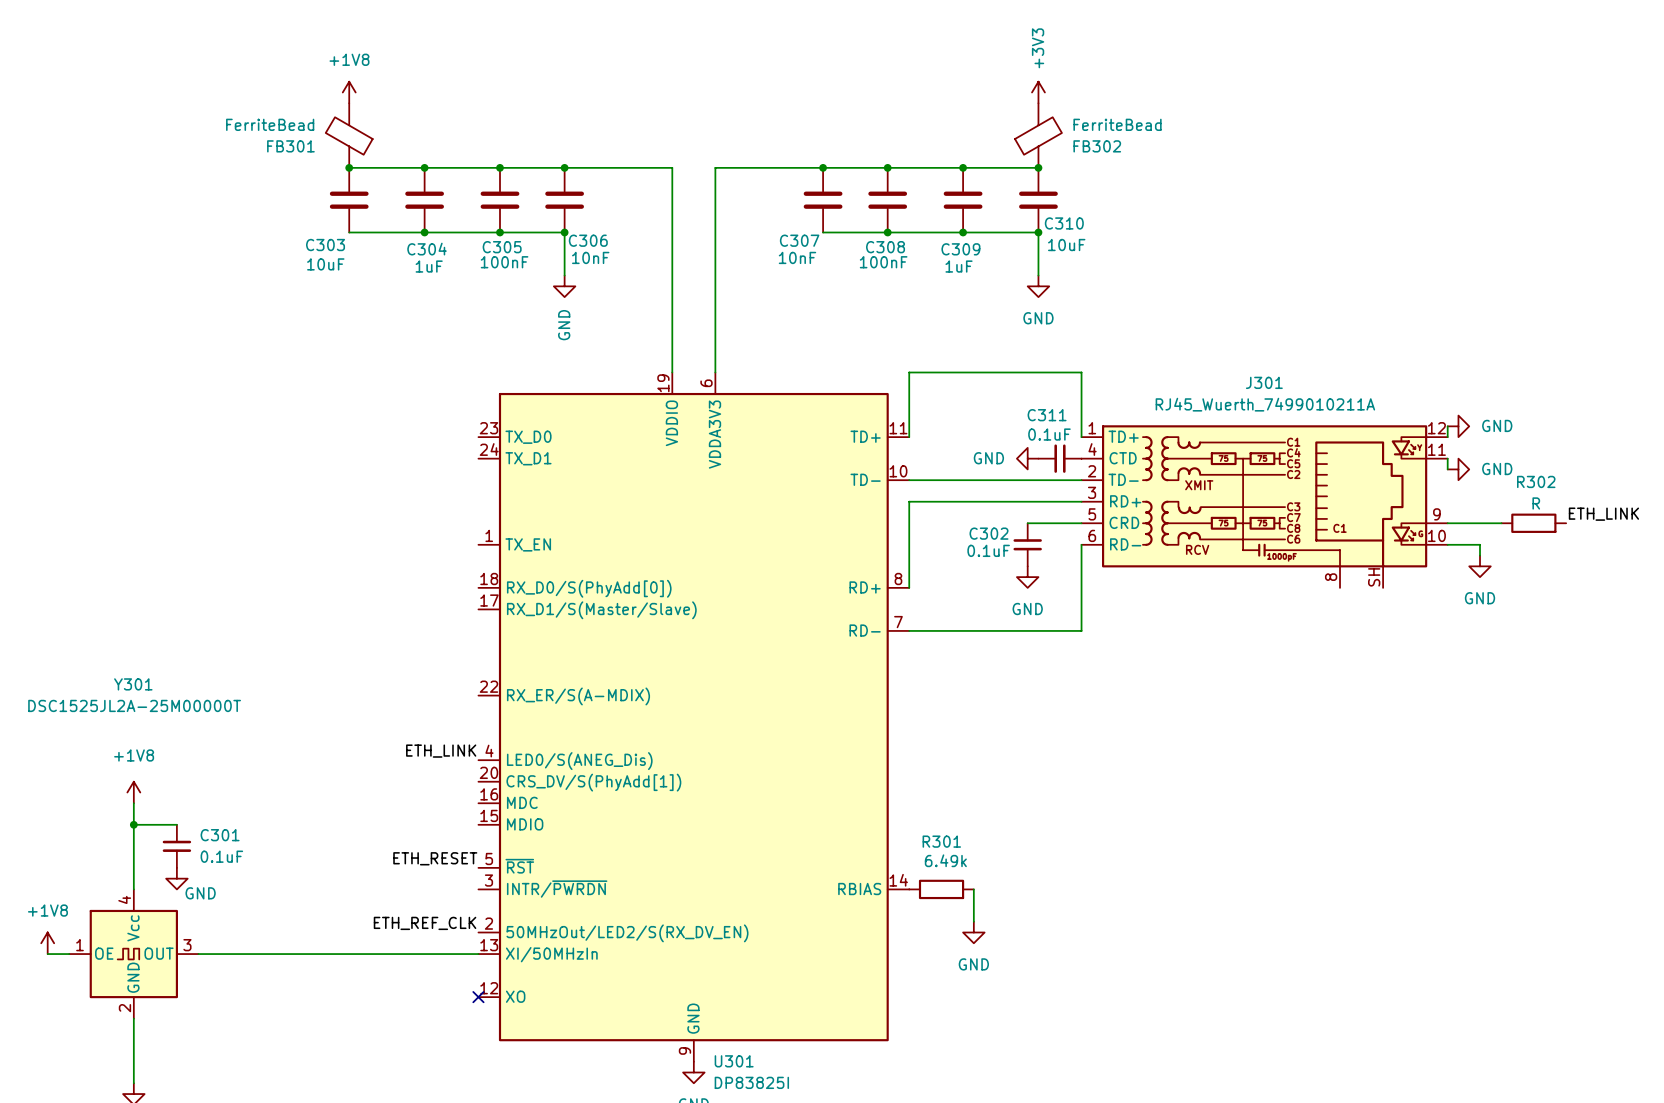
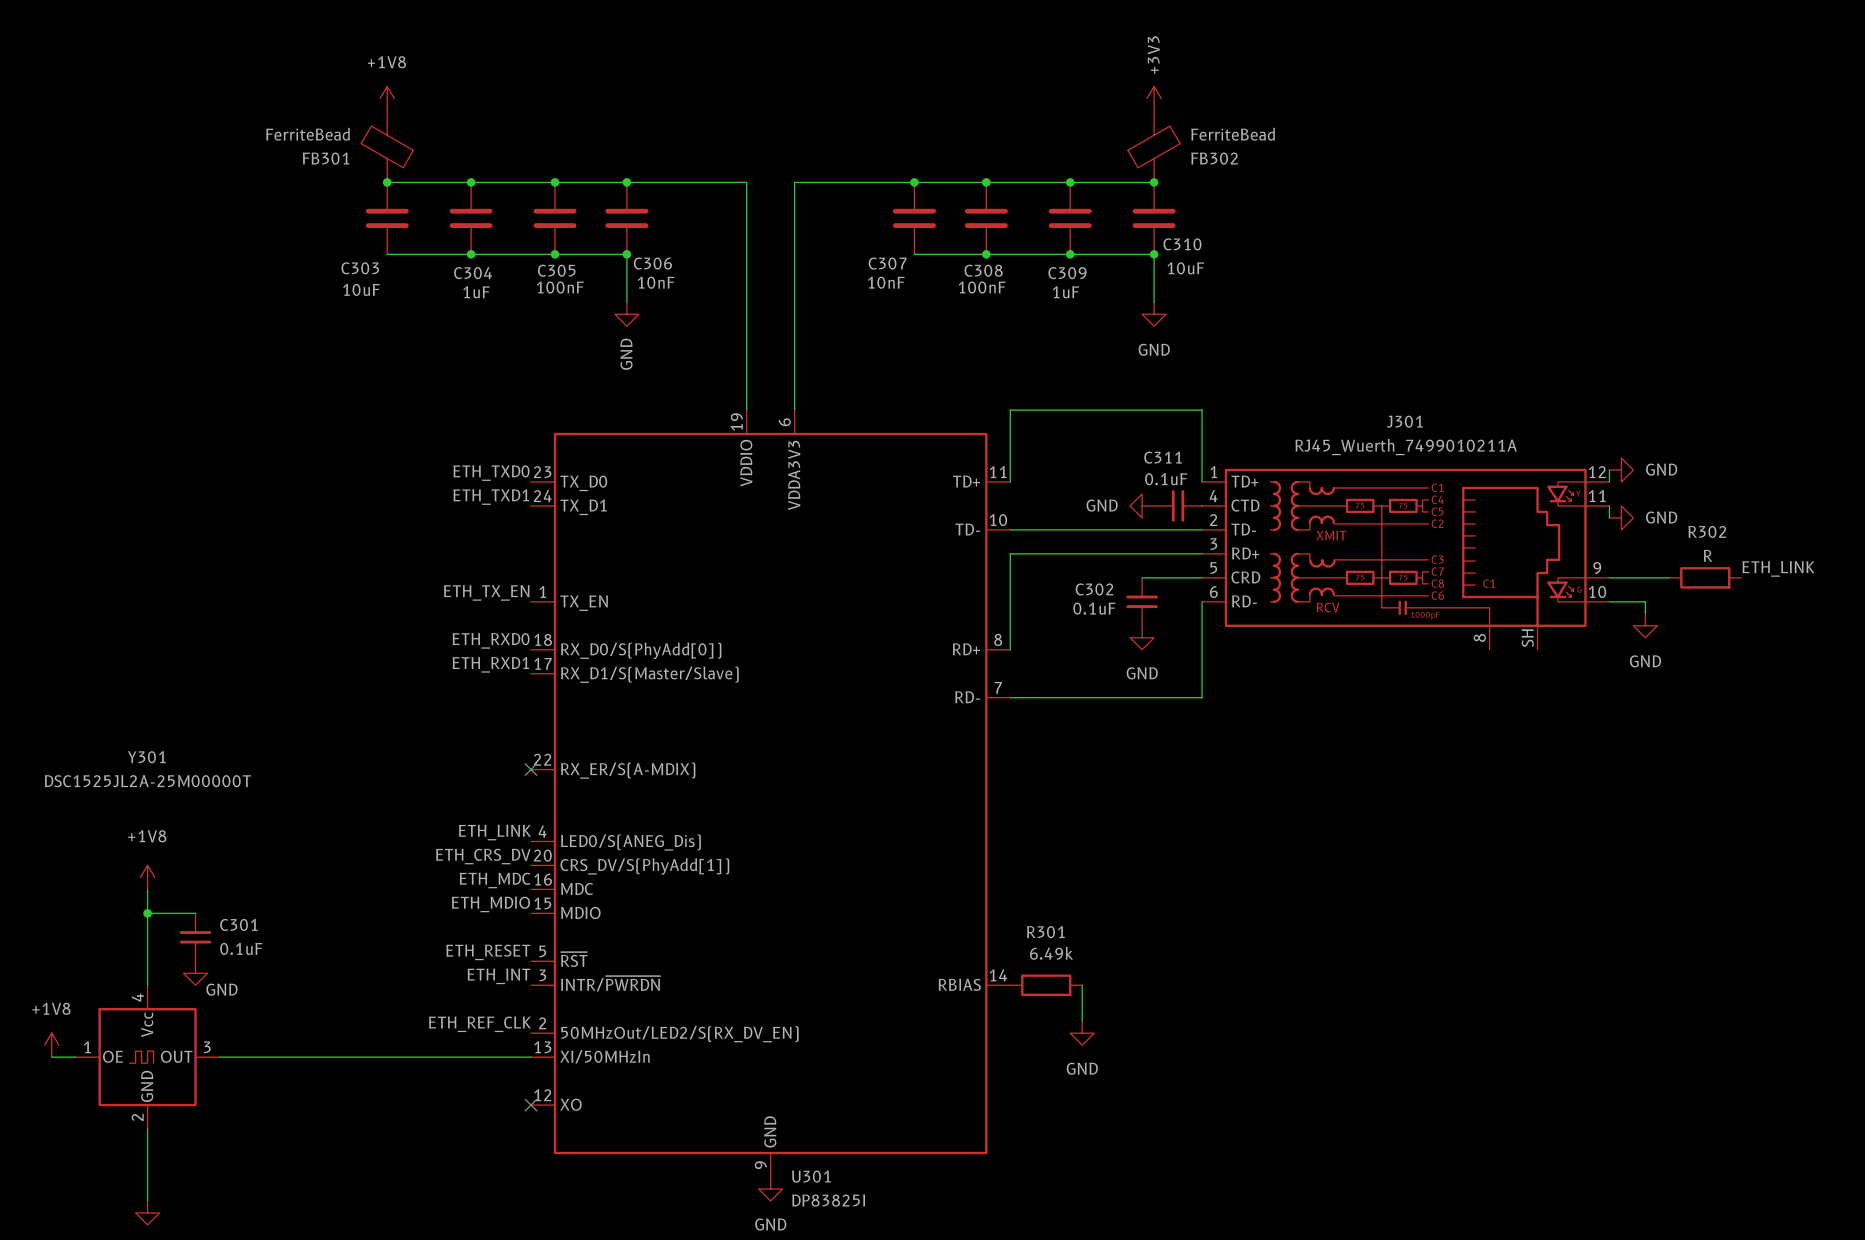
label: none -> ETH_TXD0 (491, 473)
label: none -> ETH_TXD1 (491, 497)
label: none -> ETH_TX_EN (486, 592)
label: none -> ETH_RXD0 (491, 640)
label: none -> ETH_RXD1 (490, 664)
no-connect mark: none -> (531, 769)
label: none -> ETH_CRS_DV (483, 856)
label: none -> ETH_MDC (495, 880)
label: none -> ETH_MDIO (490, 904)
label: none -> ETH_INT (498, 976)

